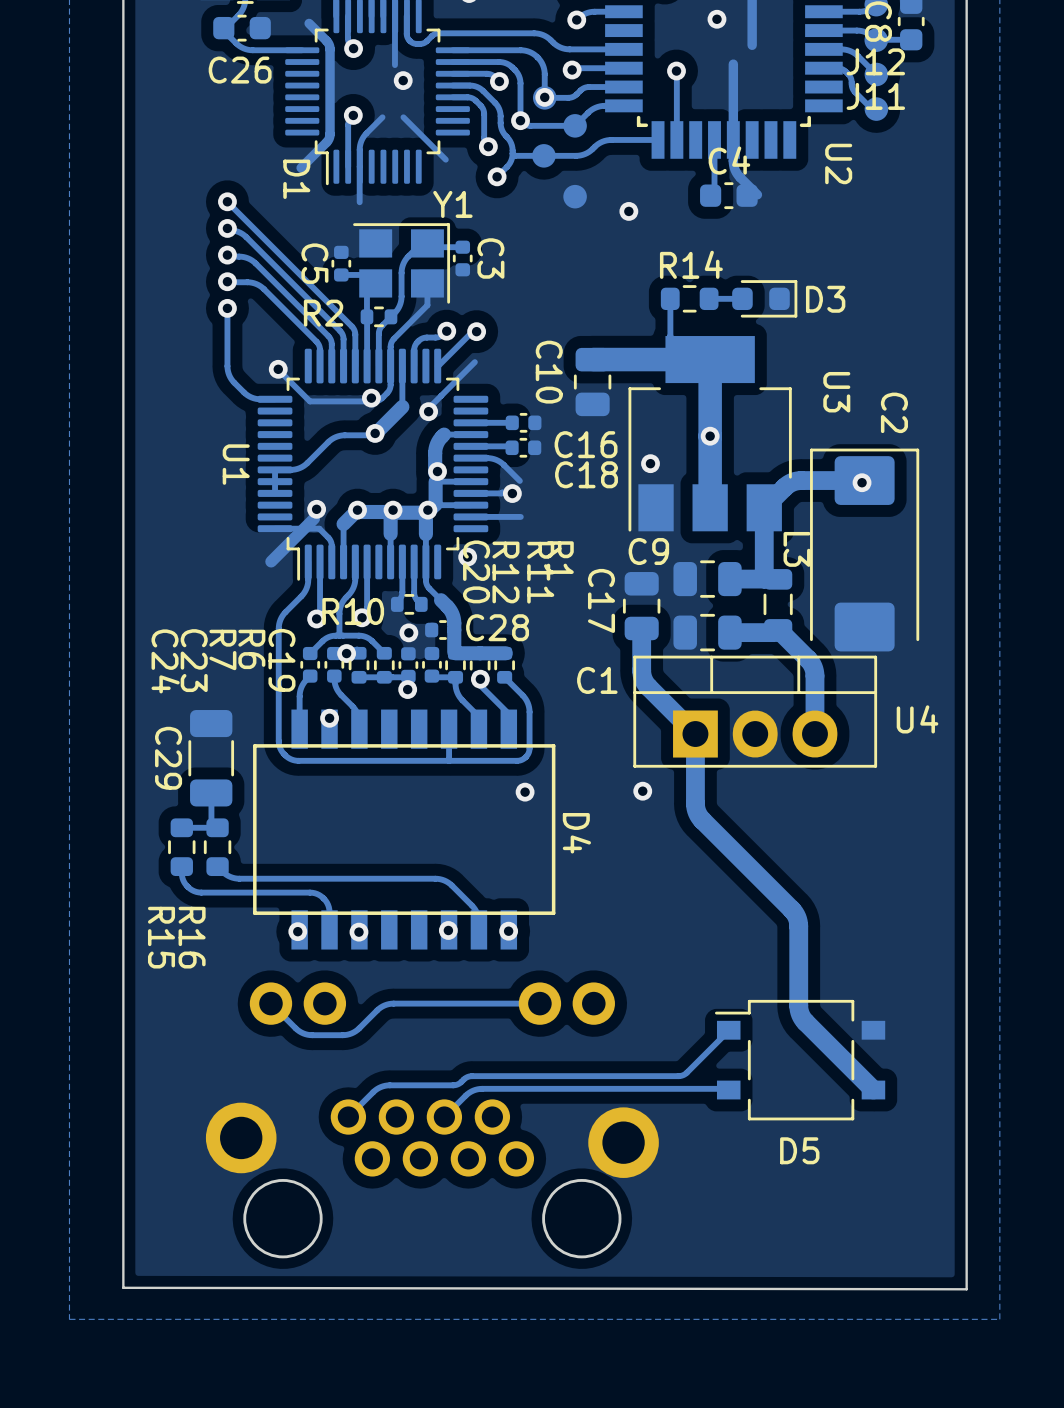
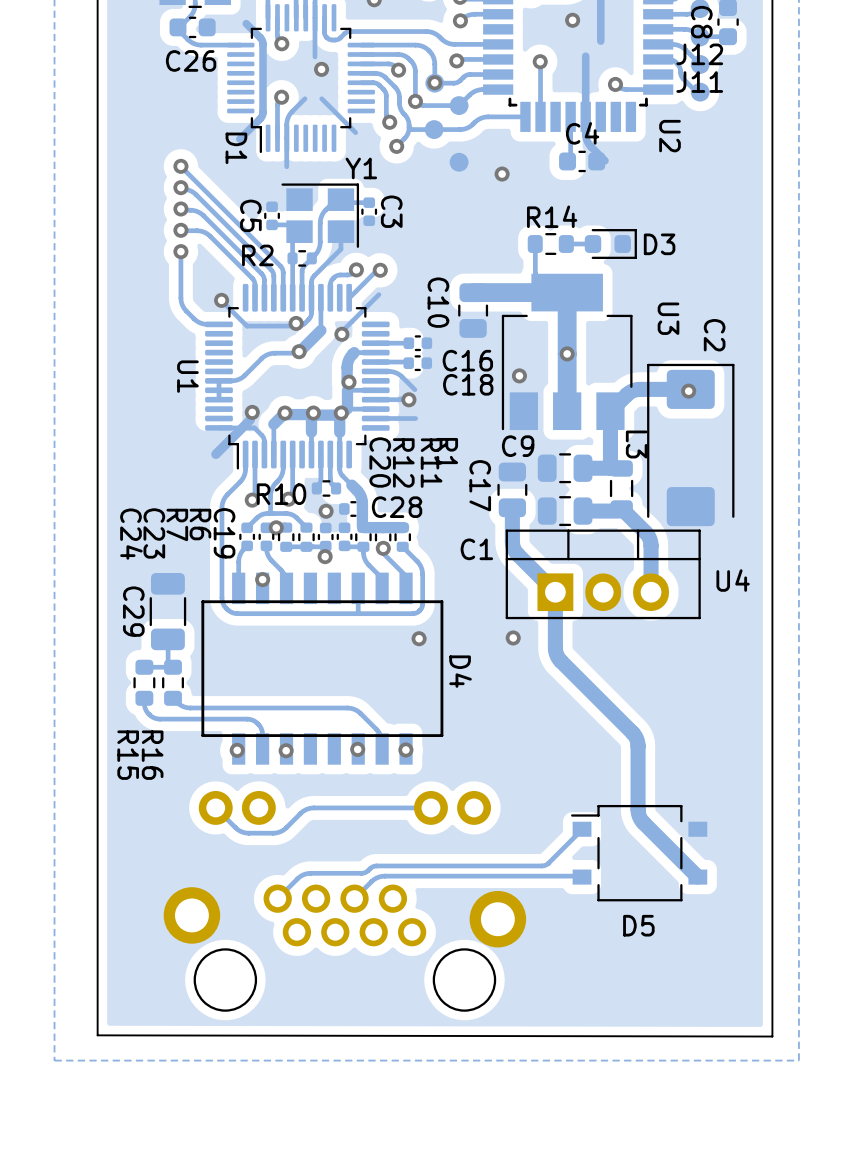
track: none -> (615, 84) (624, 89) (658, 89)
via: none -> (615, 84)
via: (467, 557) -> none

